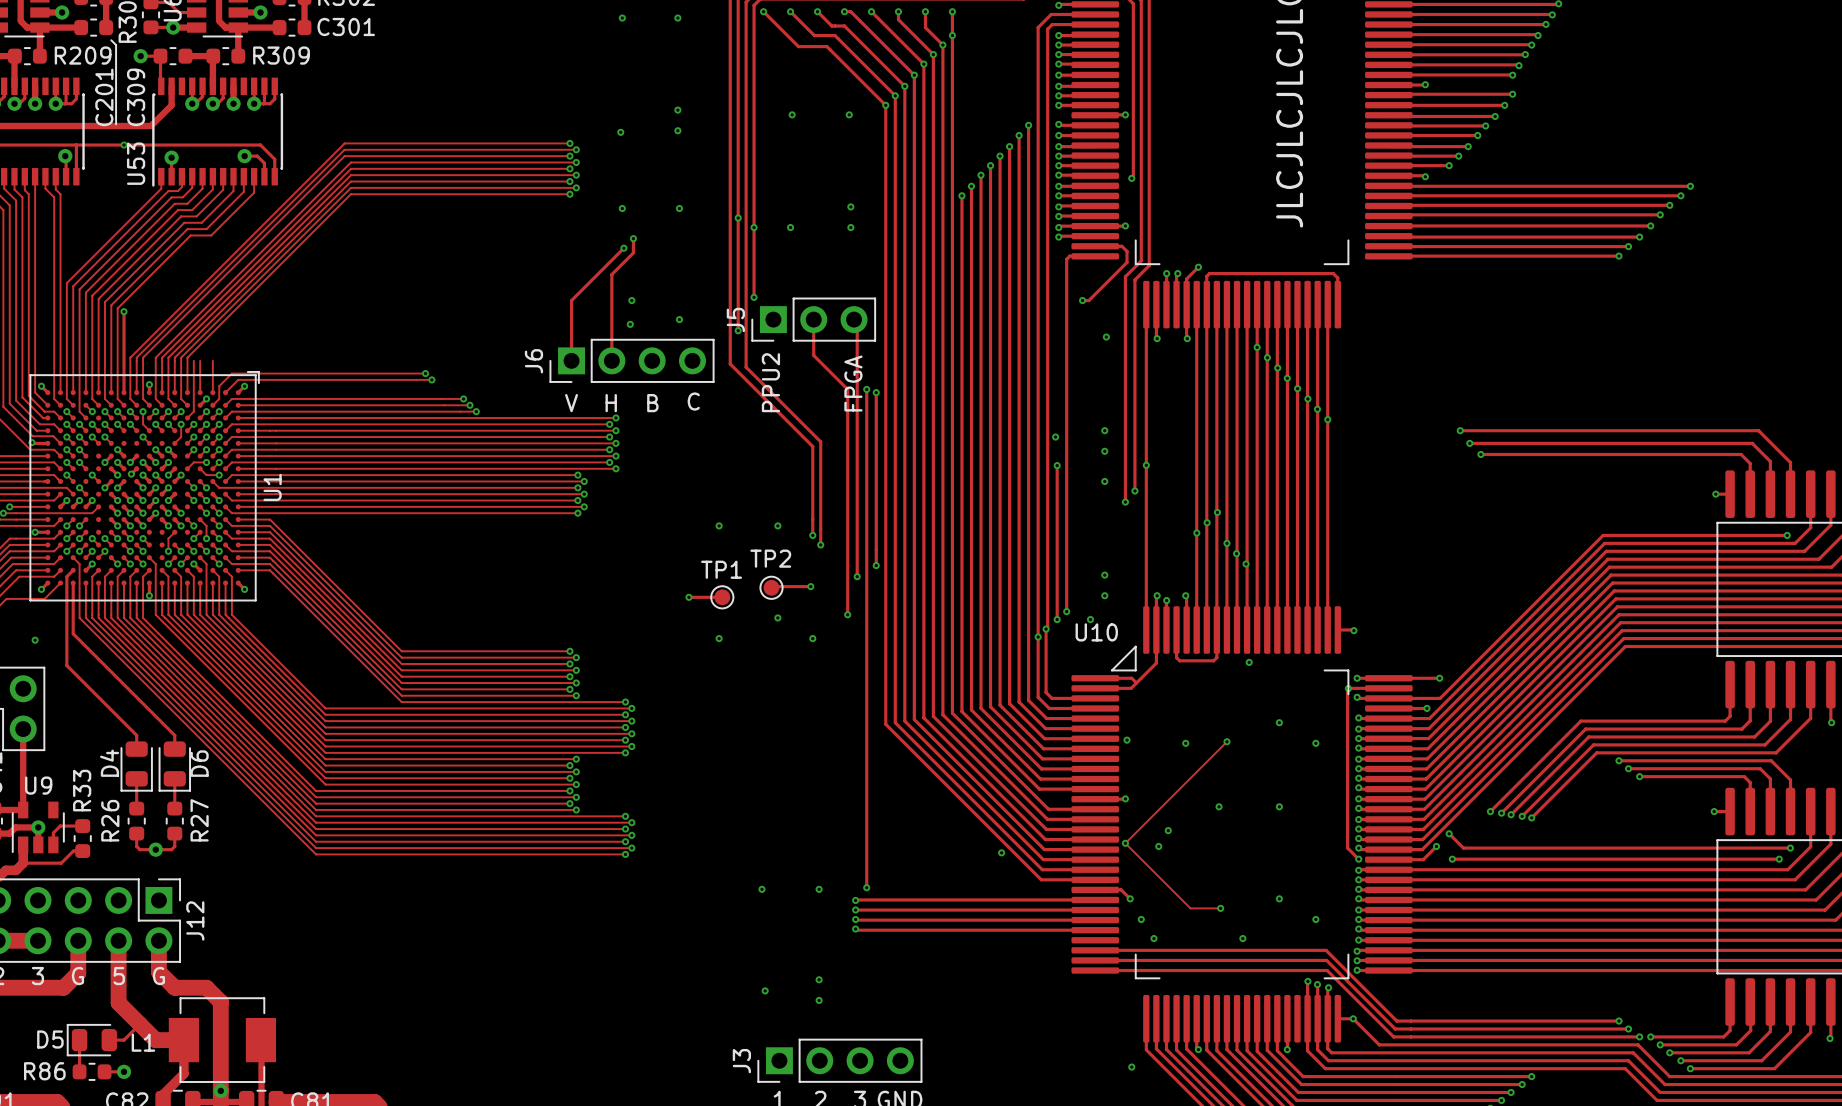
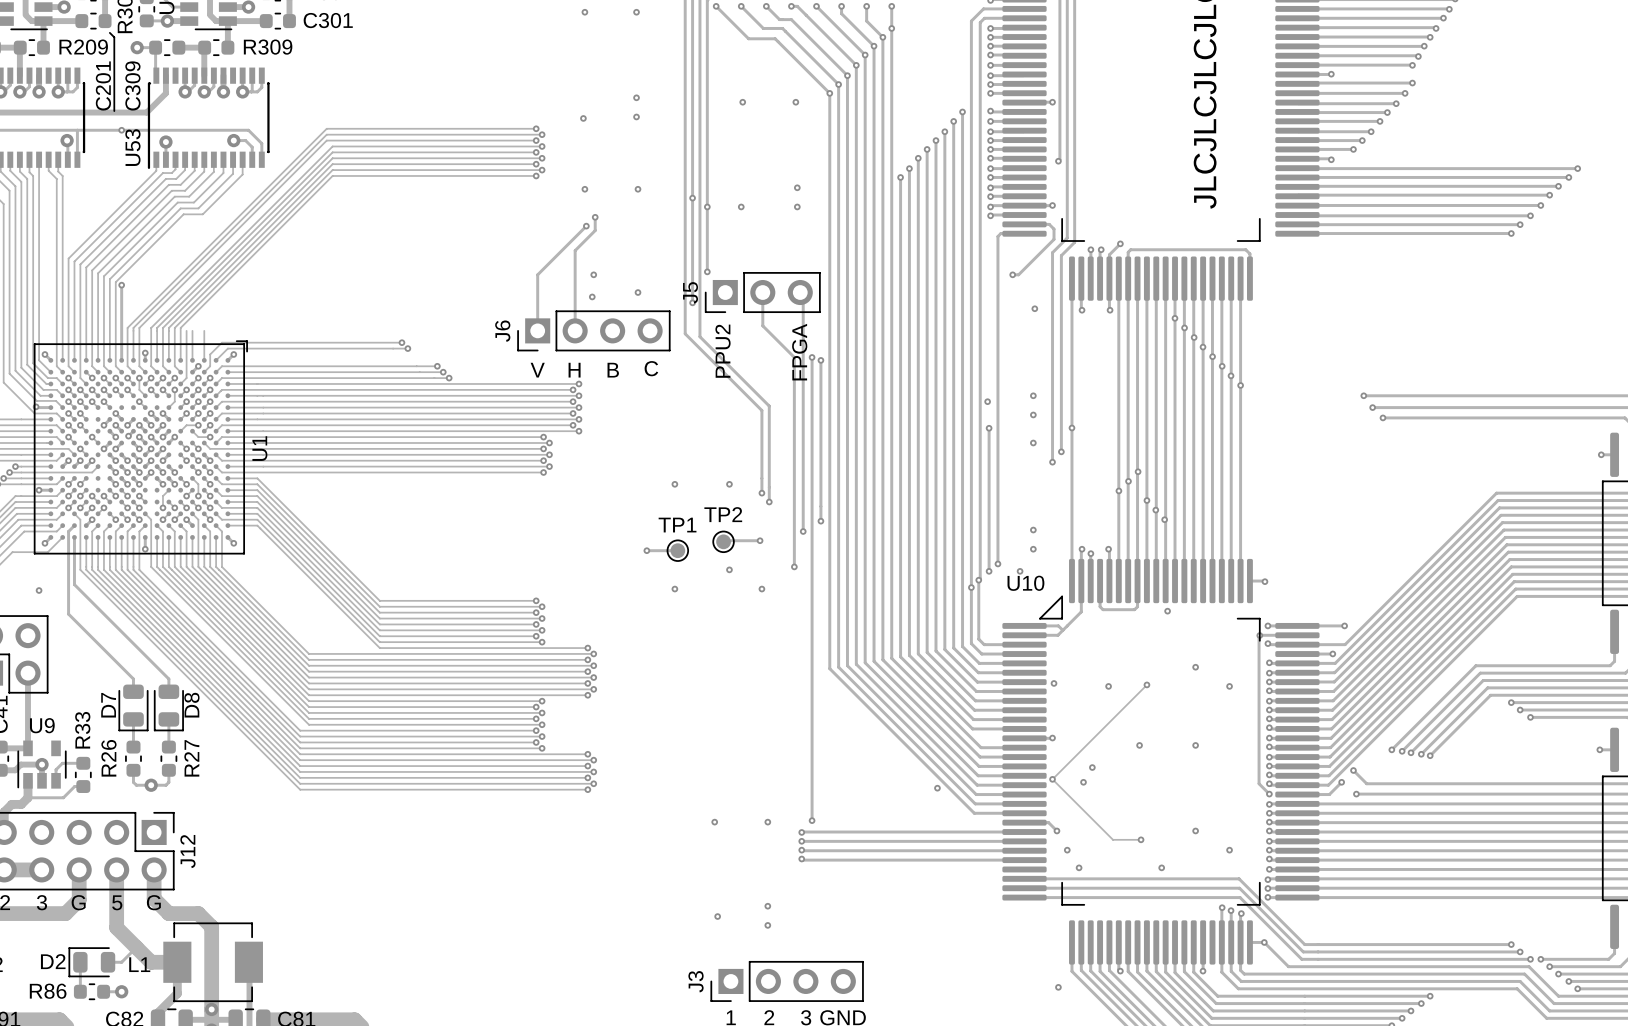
D4 name: D4 (109, 763) -> D7 (108, 705)
D6 name: D6 (199, 763) -> D8 (191, 705)
D5 name: D5 (50, 1039) -> D2 (53, 961)

